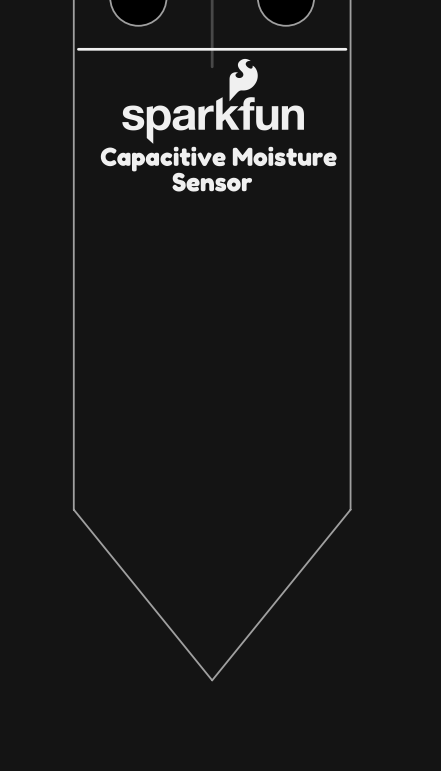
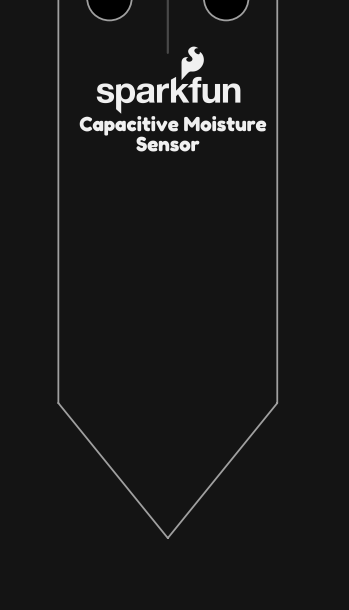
line: (78, 49) (345, 49) -> none

